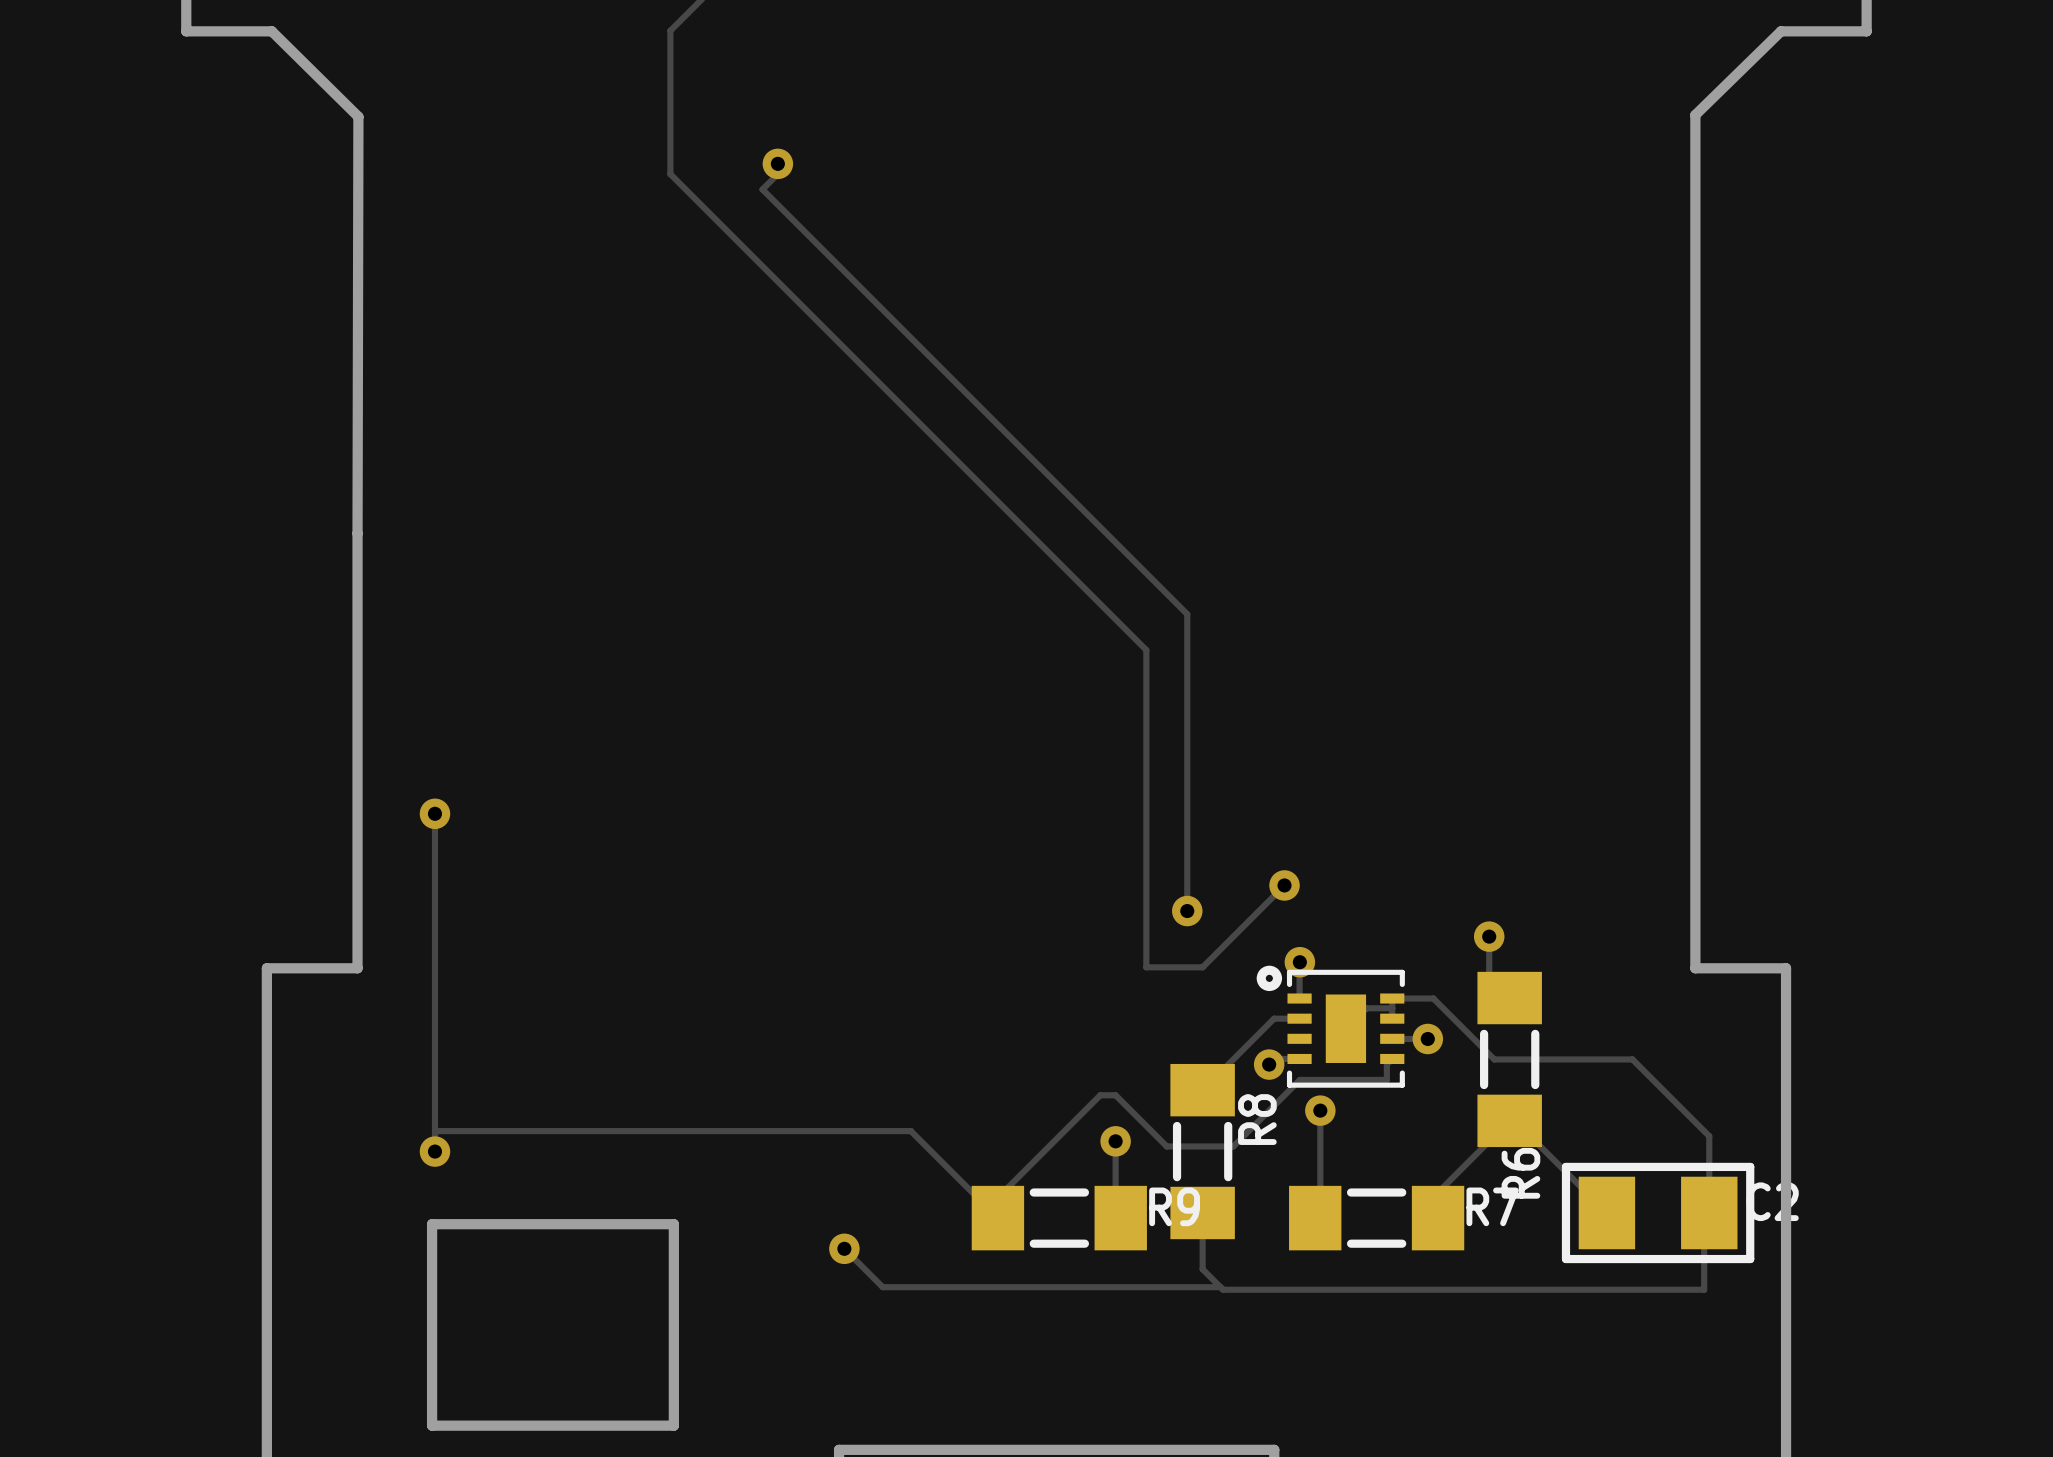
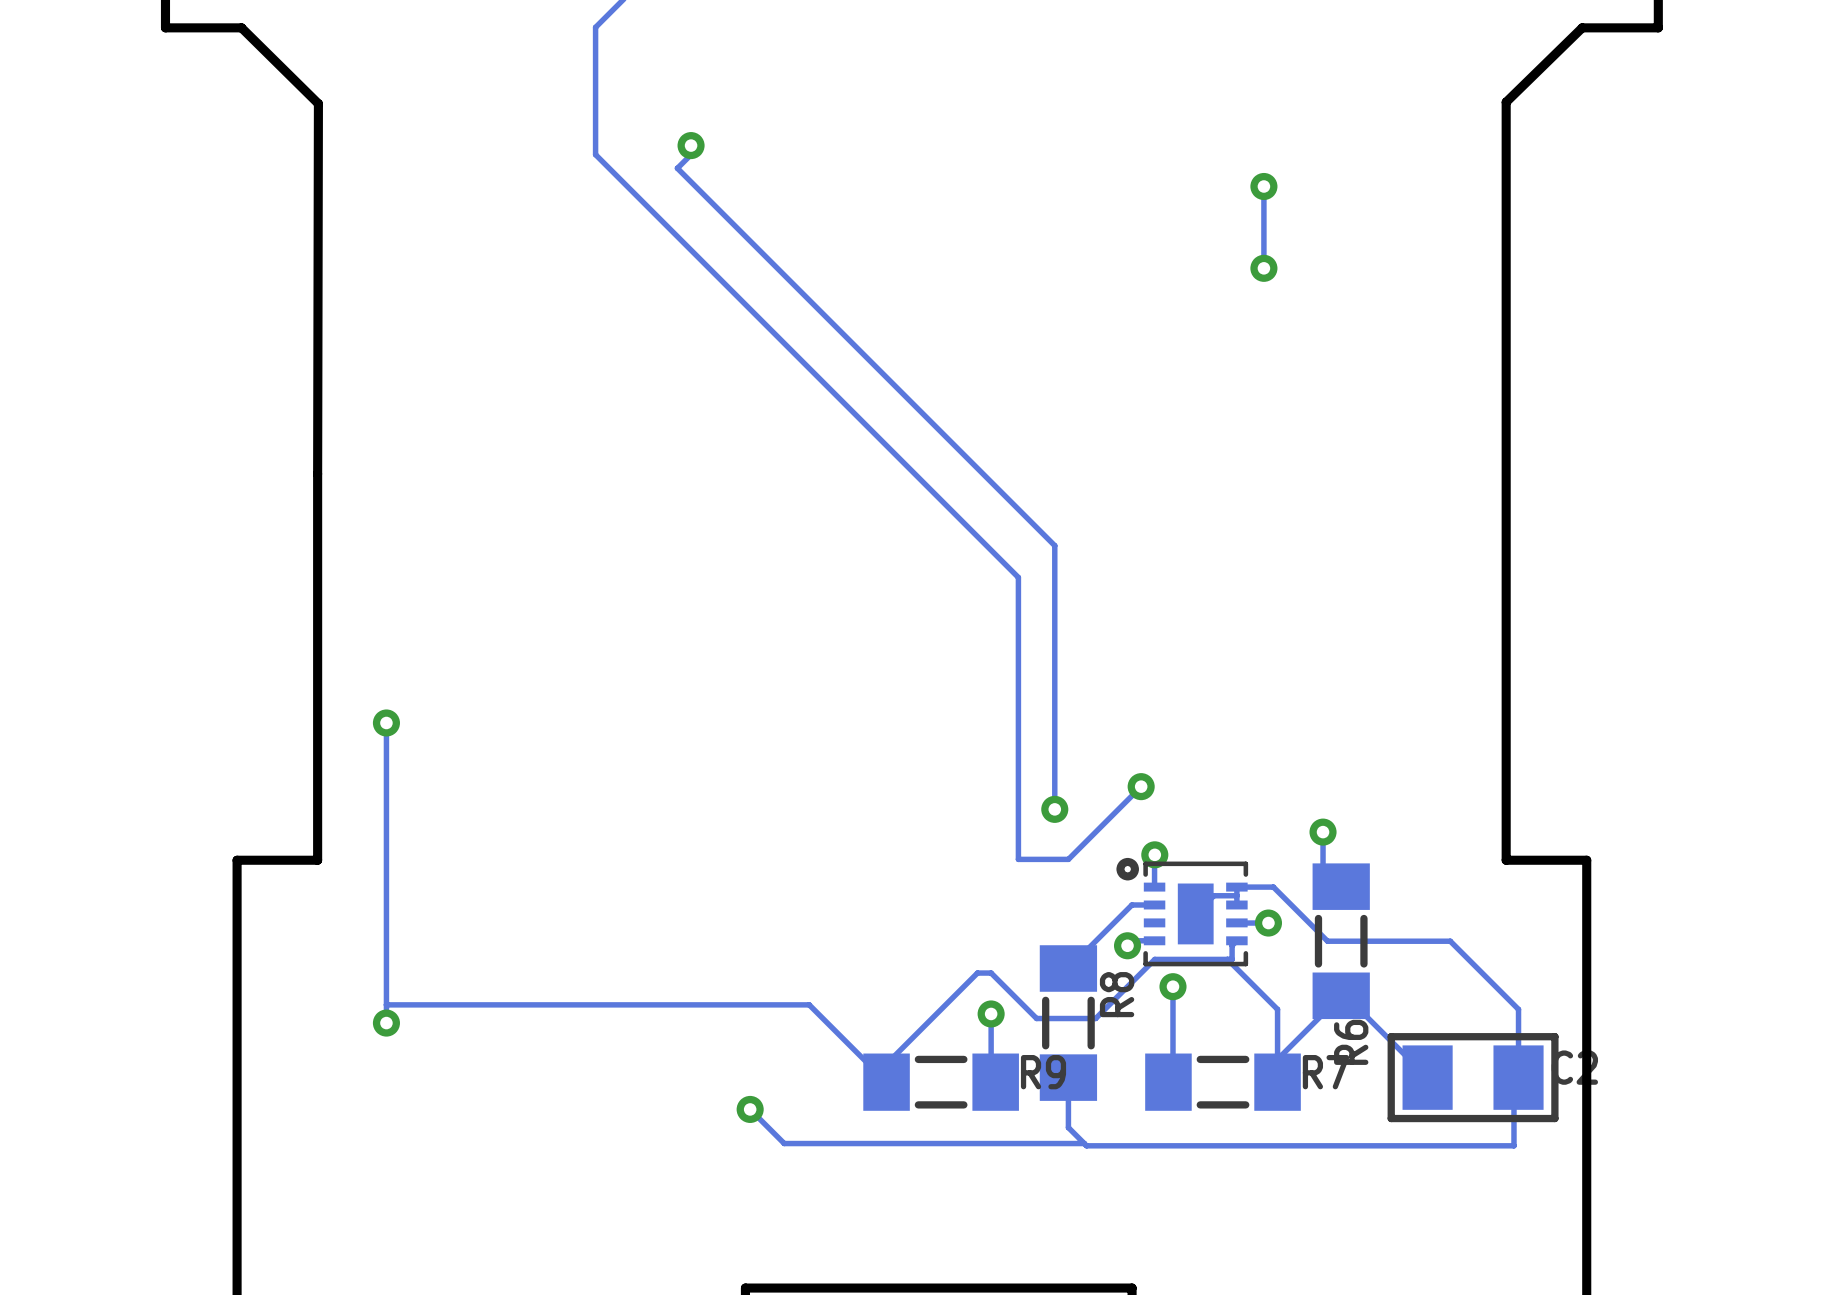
track: none -> (1263, 177) (1263, 268)
via: none -> (1263, 186)
via: none -> (1263, 268)
track: none -> (1227, 959) (1277, 1009) (1277, 1059)
board edge: (673, 1224) (673, 1425) (432, 1425) (432, 1224) (673, 1224) -> none

